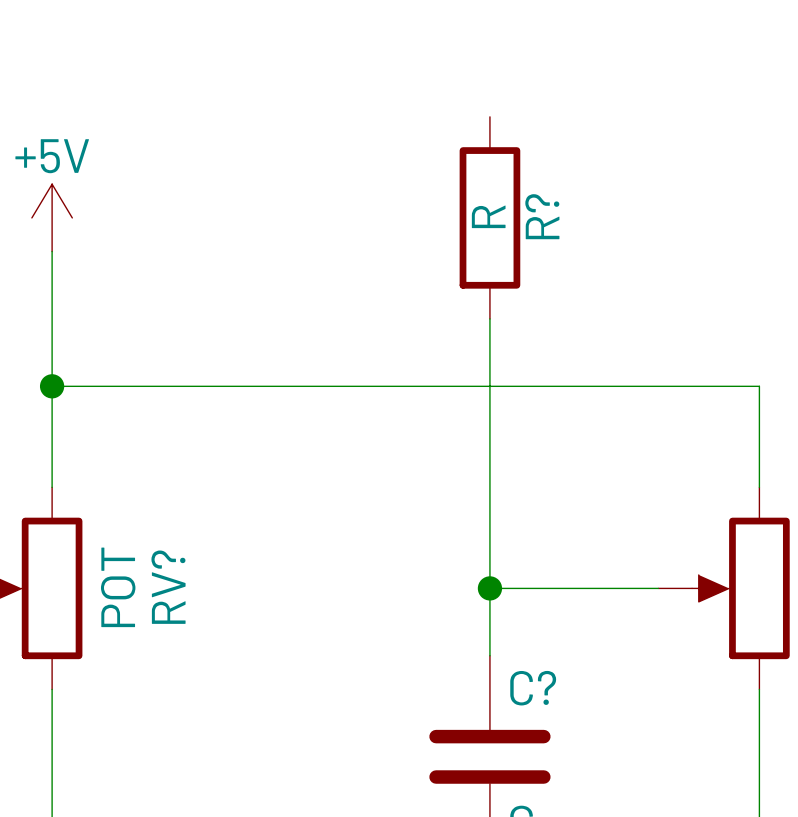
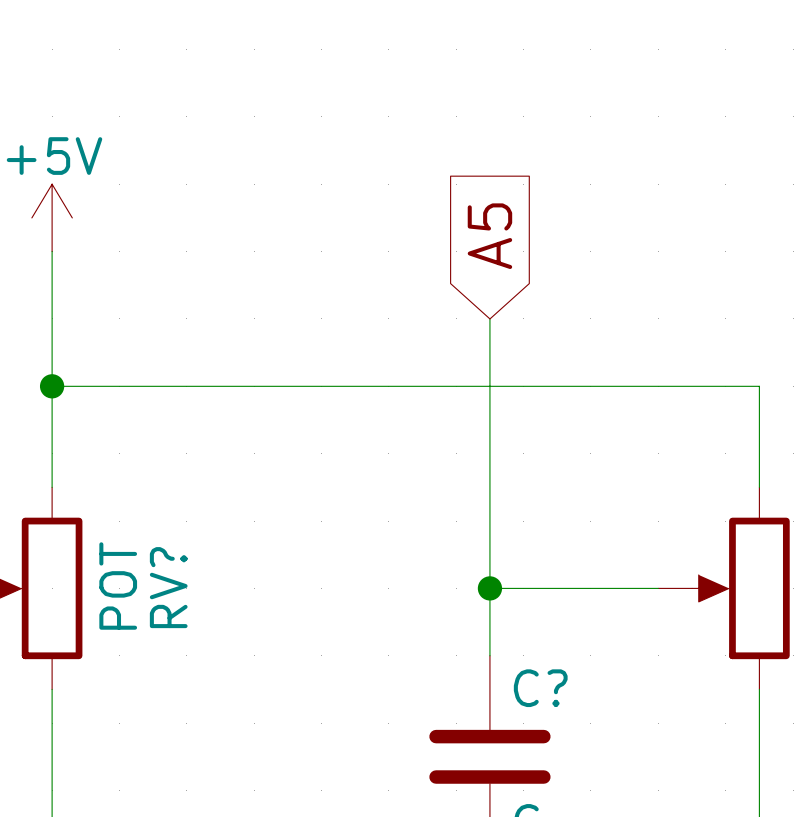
R?: R (489, 217) -> none
global label: none -> A5 (489, 236)

